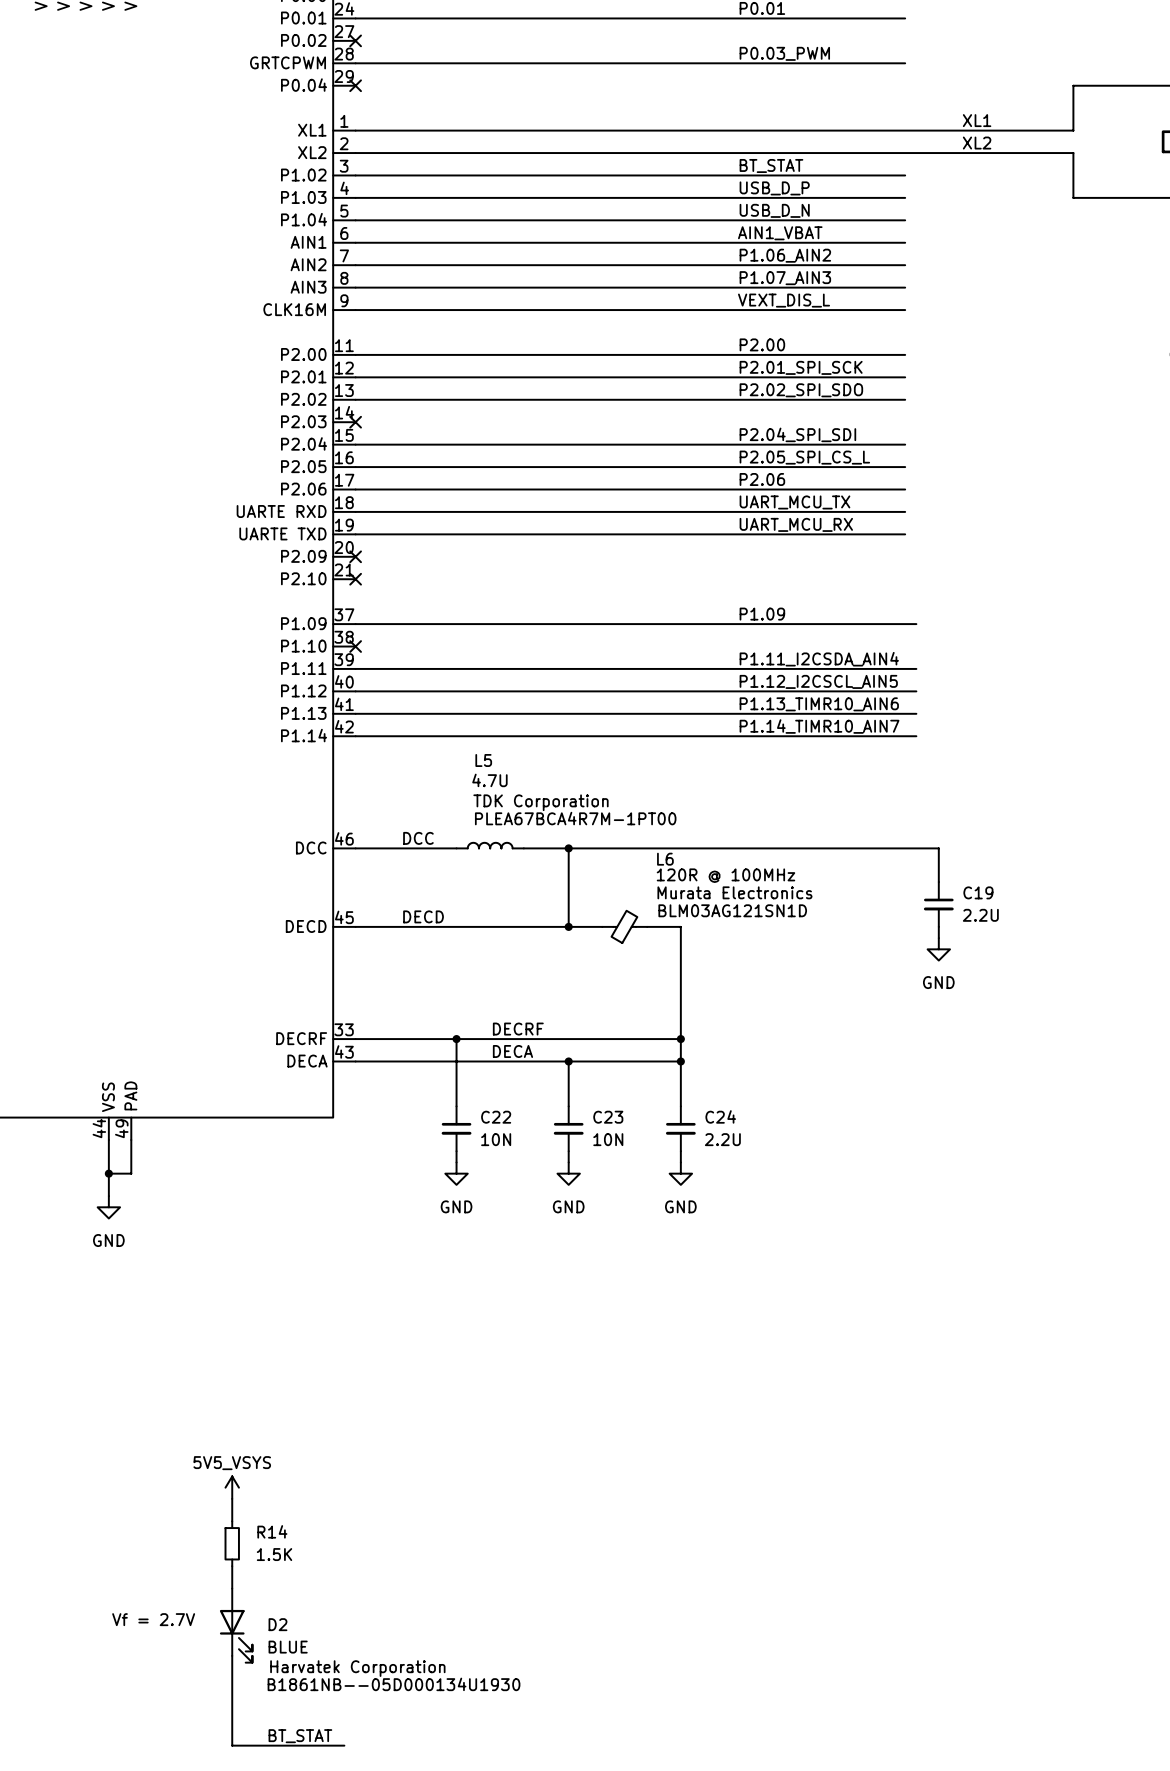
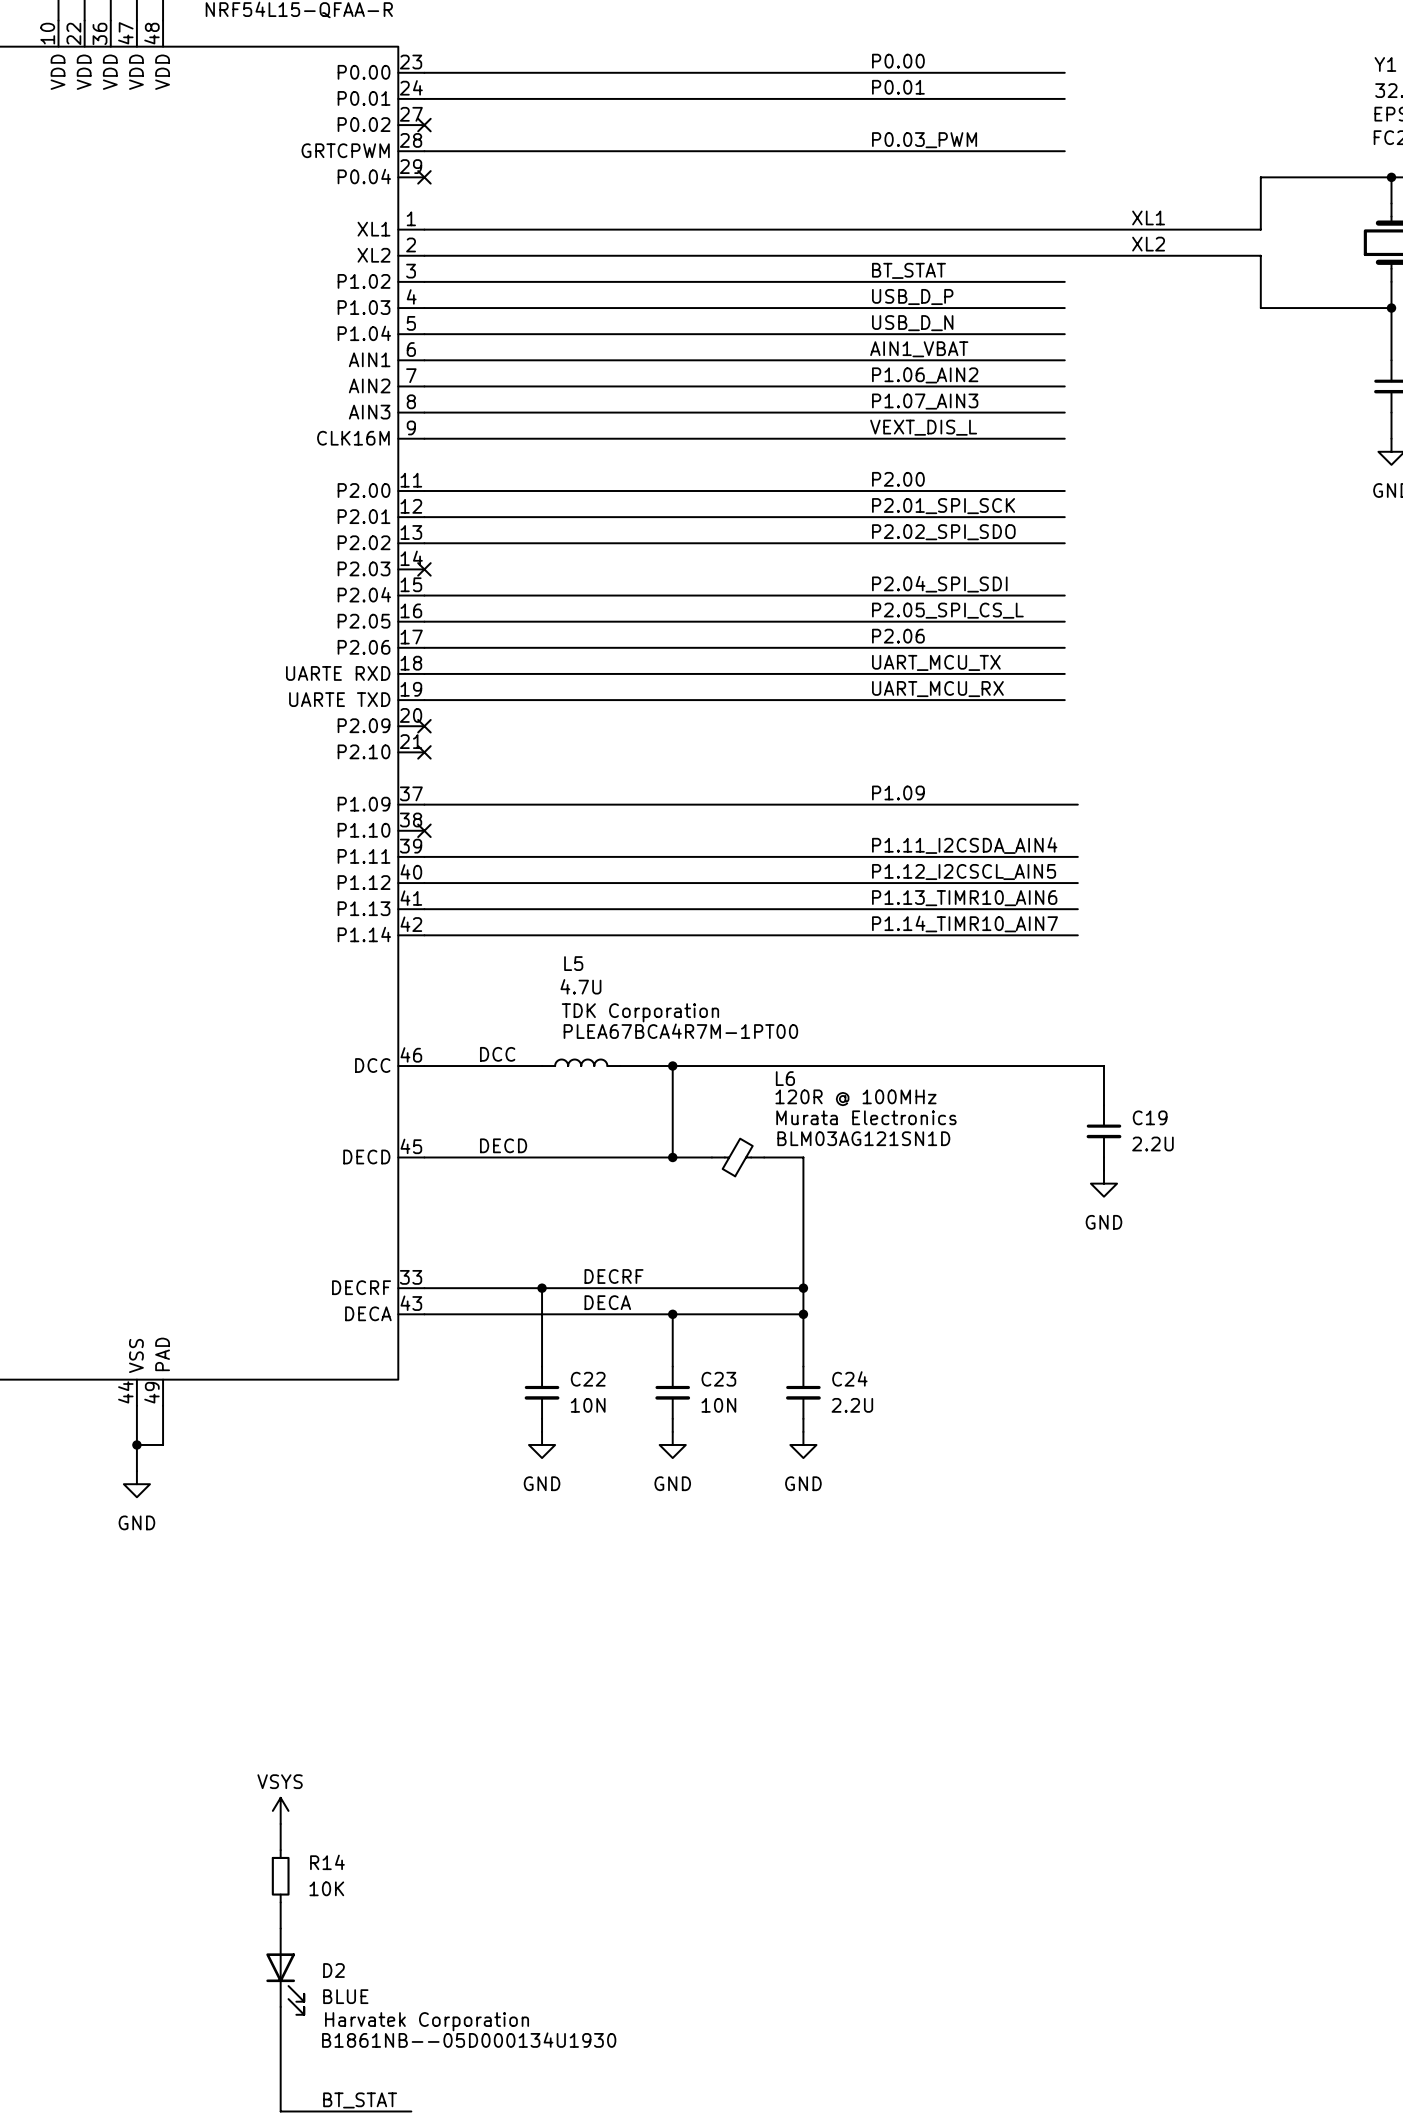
power symbol: 5V5_VSYS (232, 1487) -> VSYS (280, 1810)
R14 value: 1.5K (274, 1554) -> 10K (326, 1888)
text: Vf = 2.7V (153, 1619) -> none

